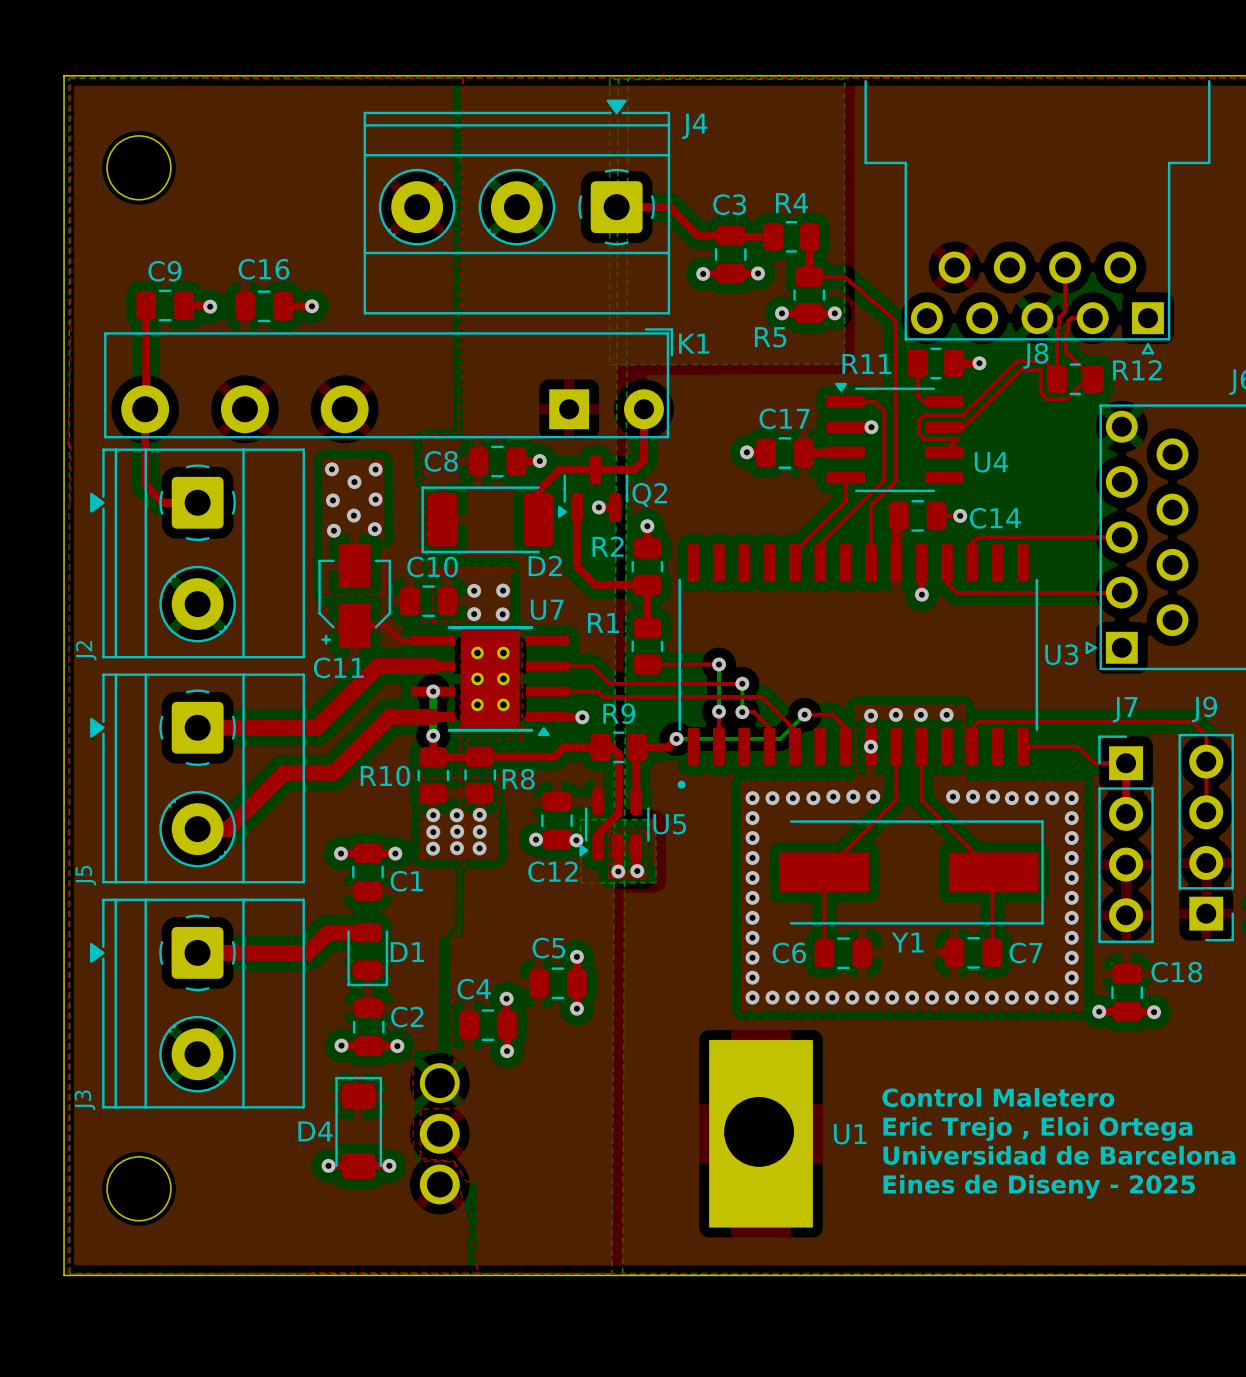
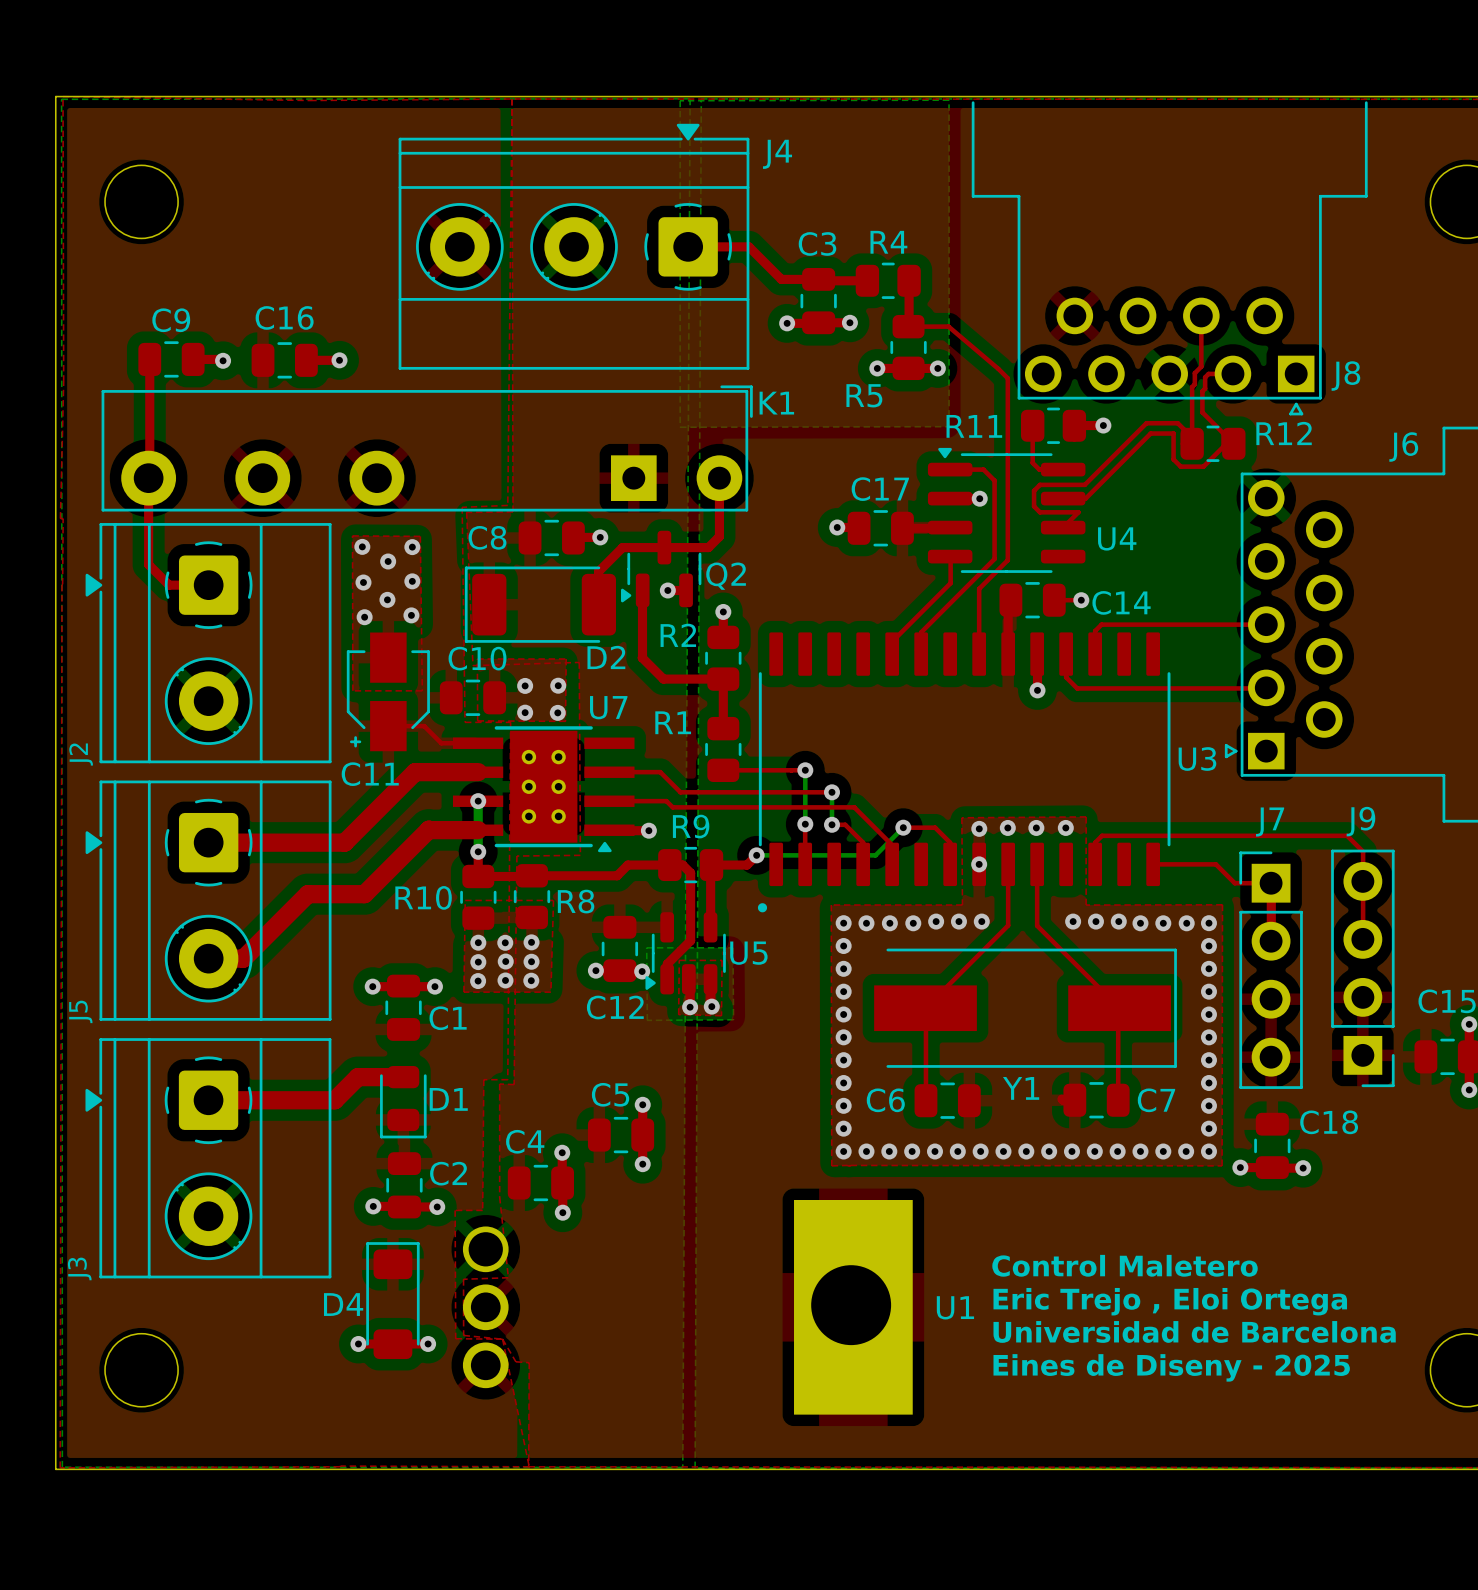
J8 name position: J8 (1035, 355) -> J8 (1345, 376)

